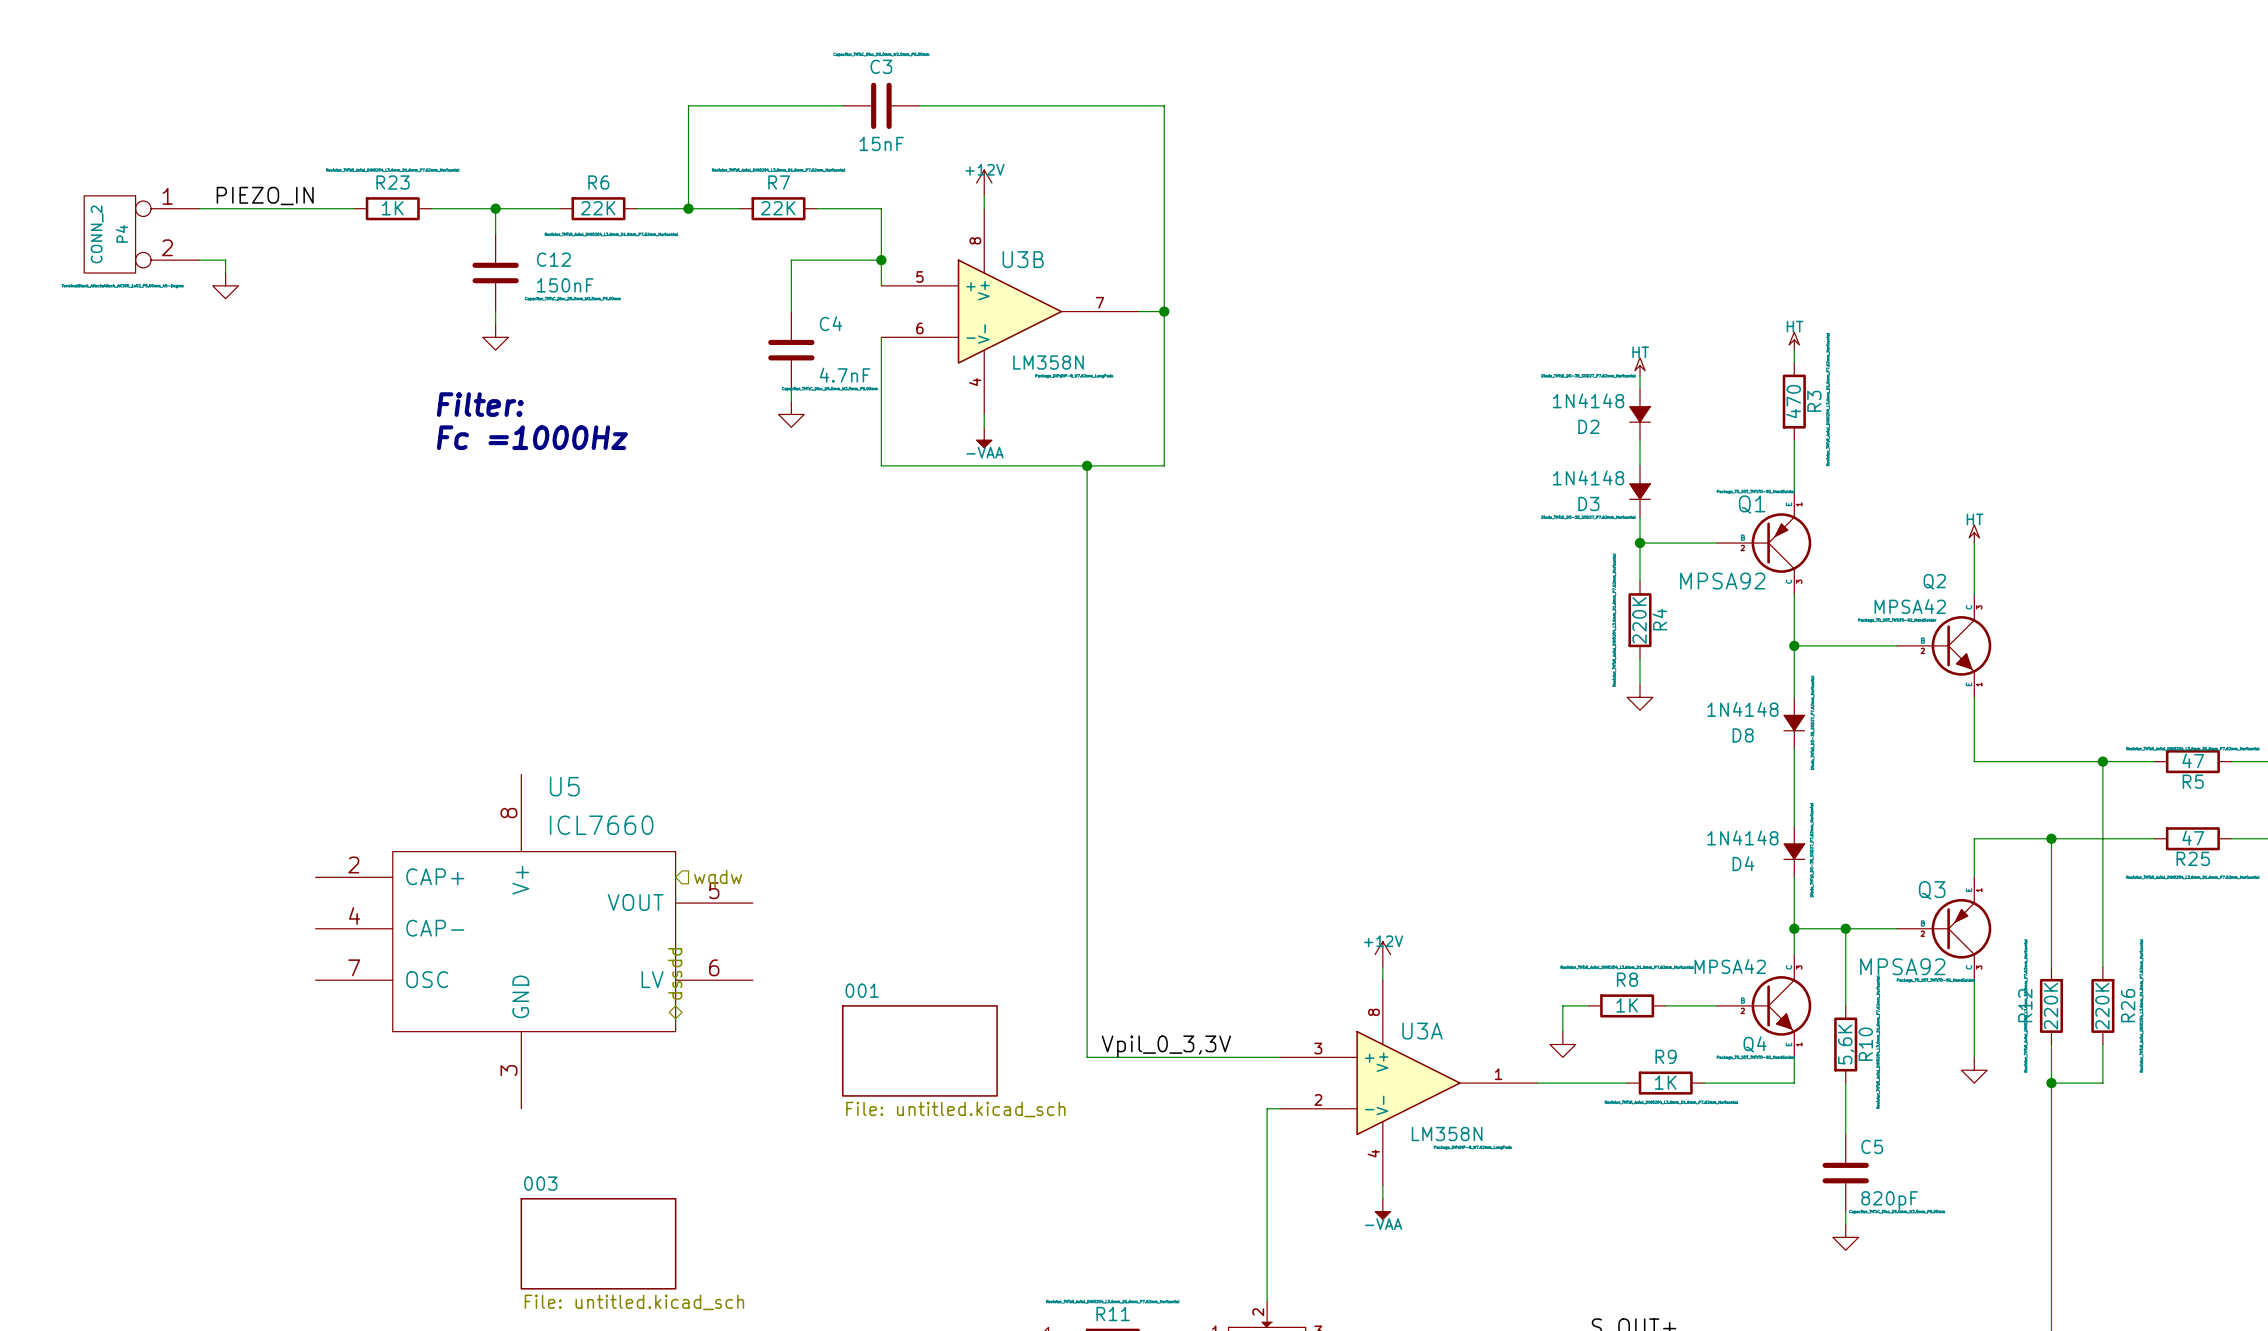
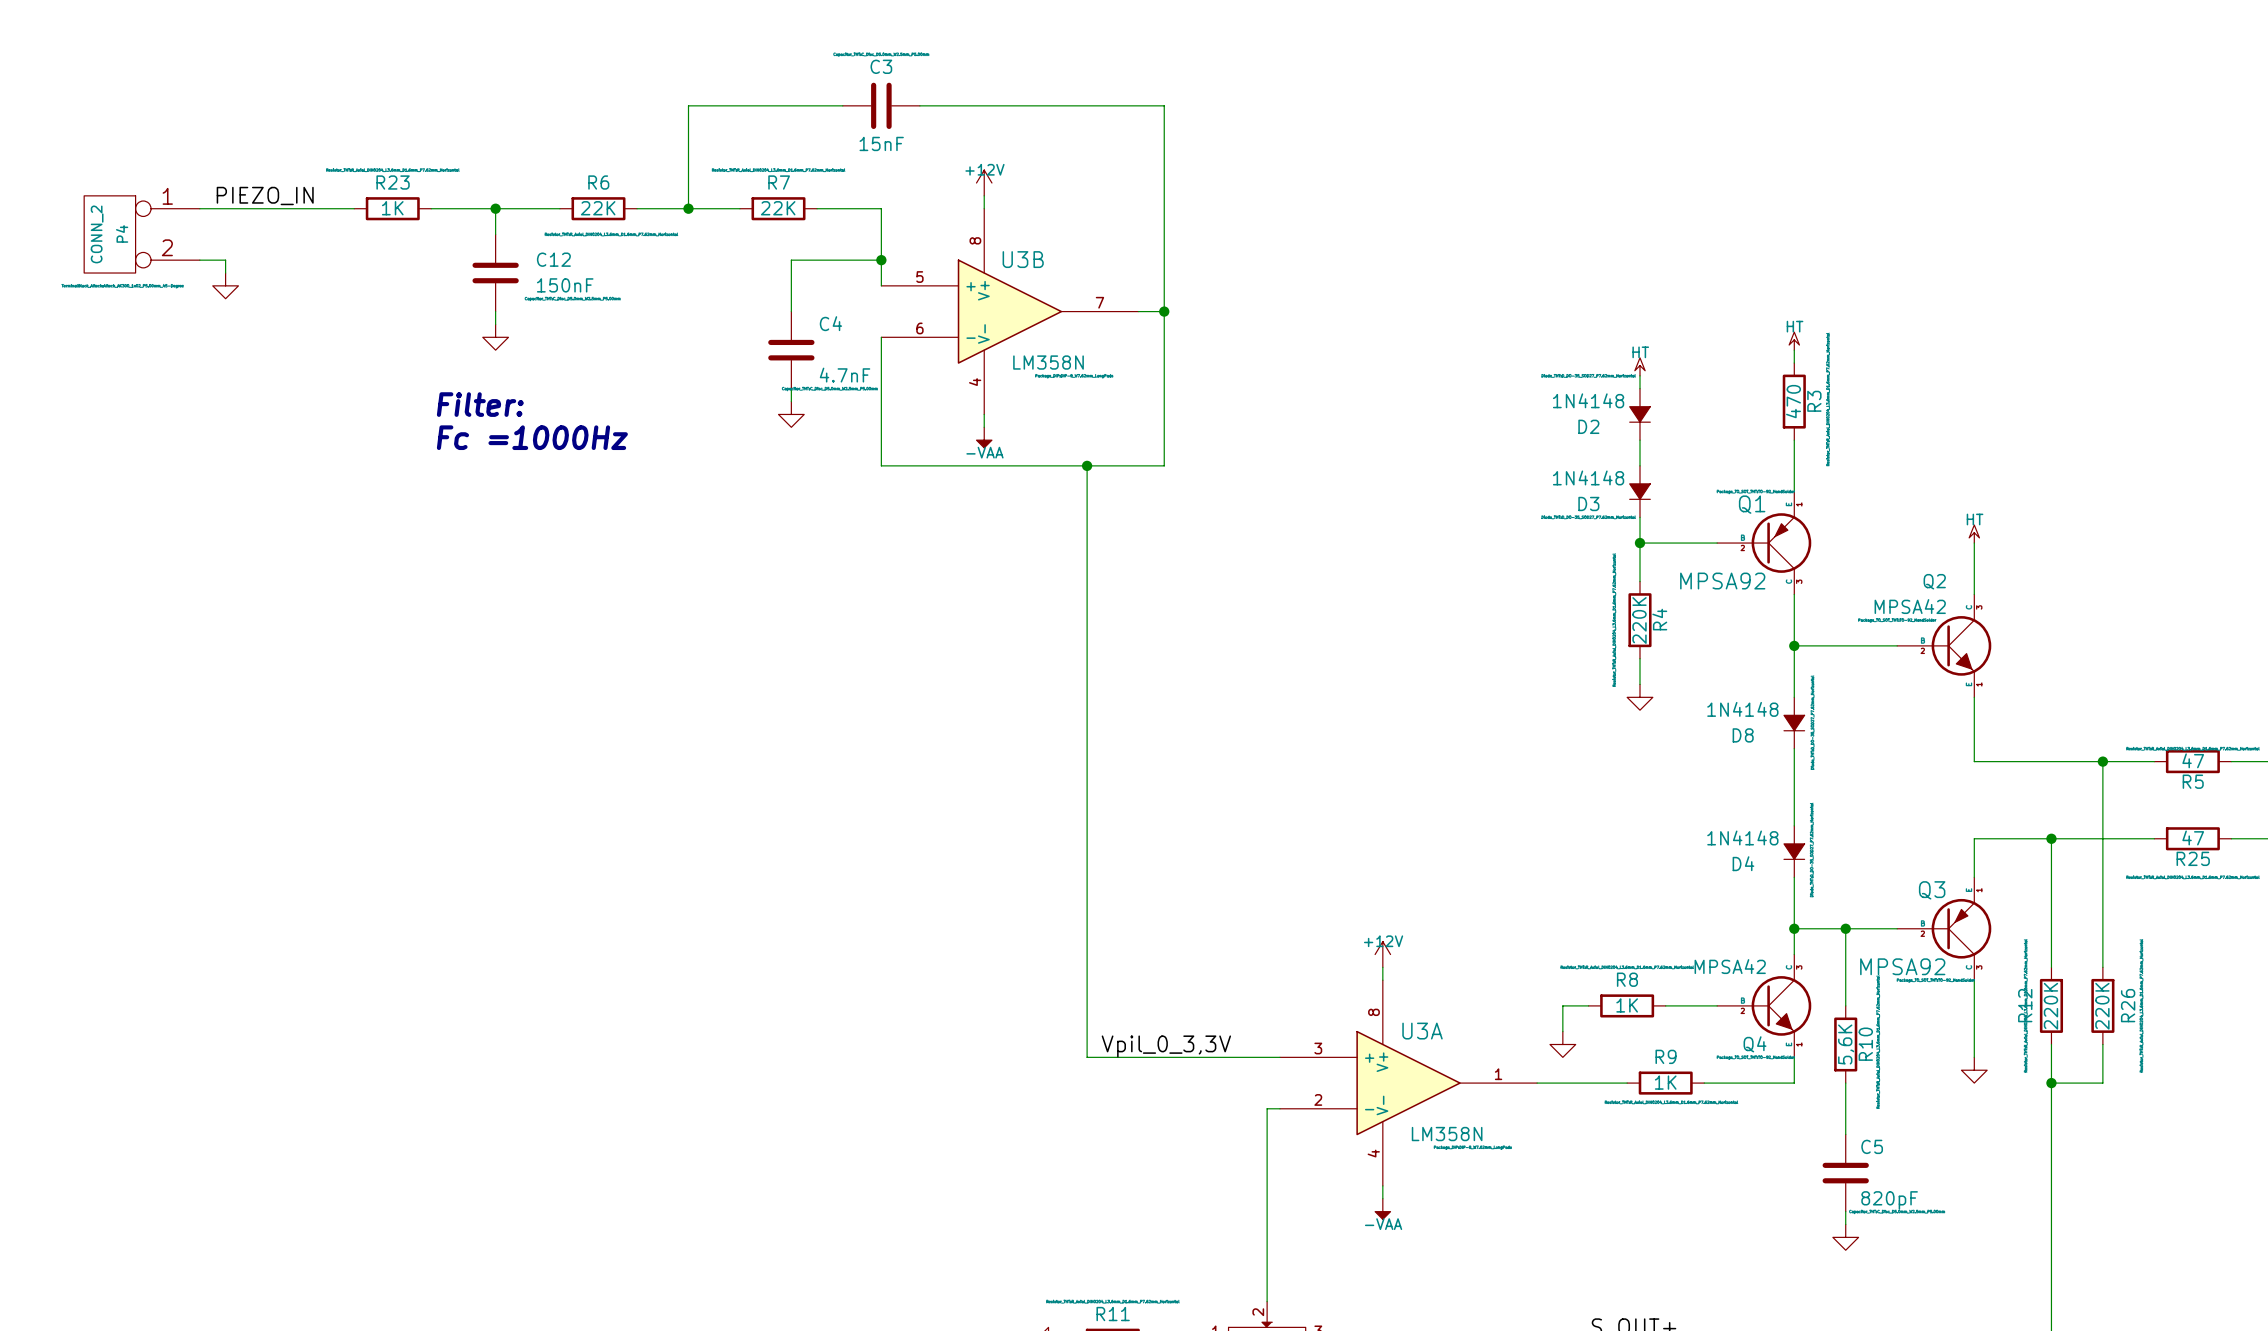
hierarchical label: wqdw (718, 879) -> none
U5: ICL7660 (534, 941) -> none
hierarchical label: dssdd (675, 973) -> none
sheet 001: File: untitled.kicad_sch (919, 1050) -> none
sheet 003: File: untitled.kicad_sch (598, 1243) -> none

